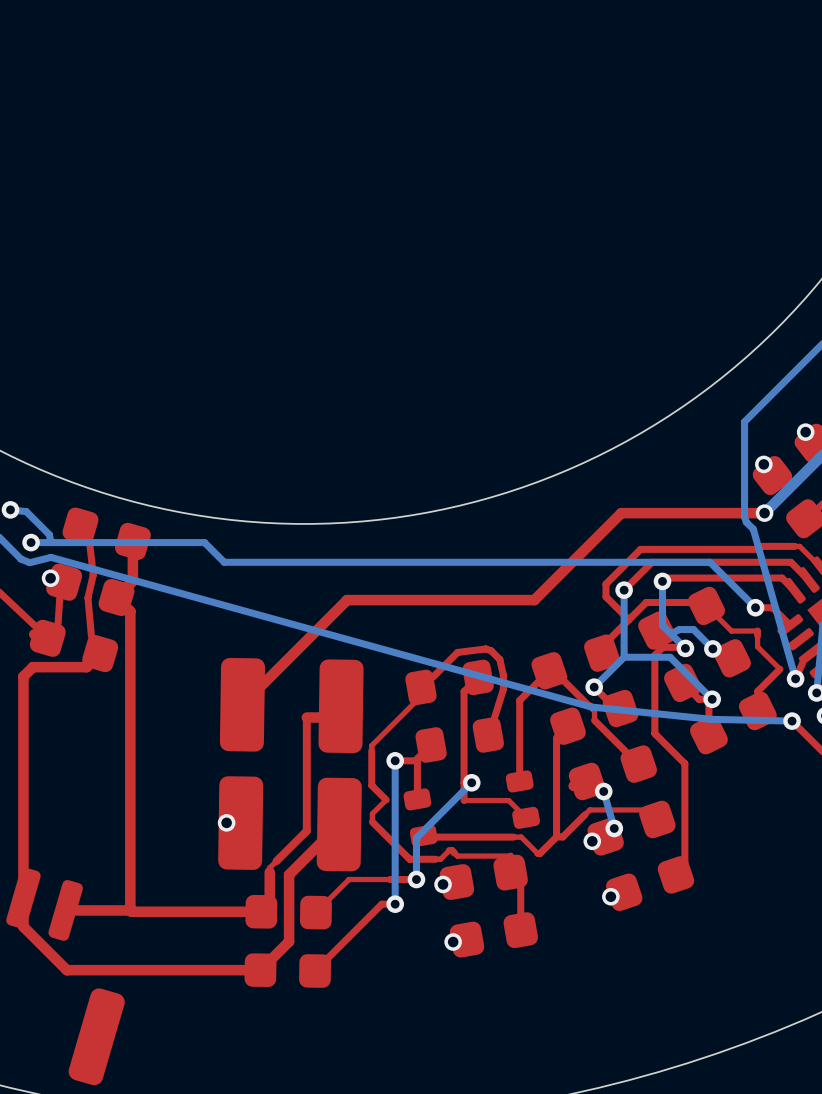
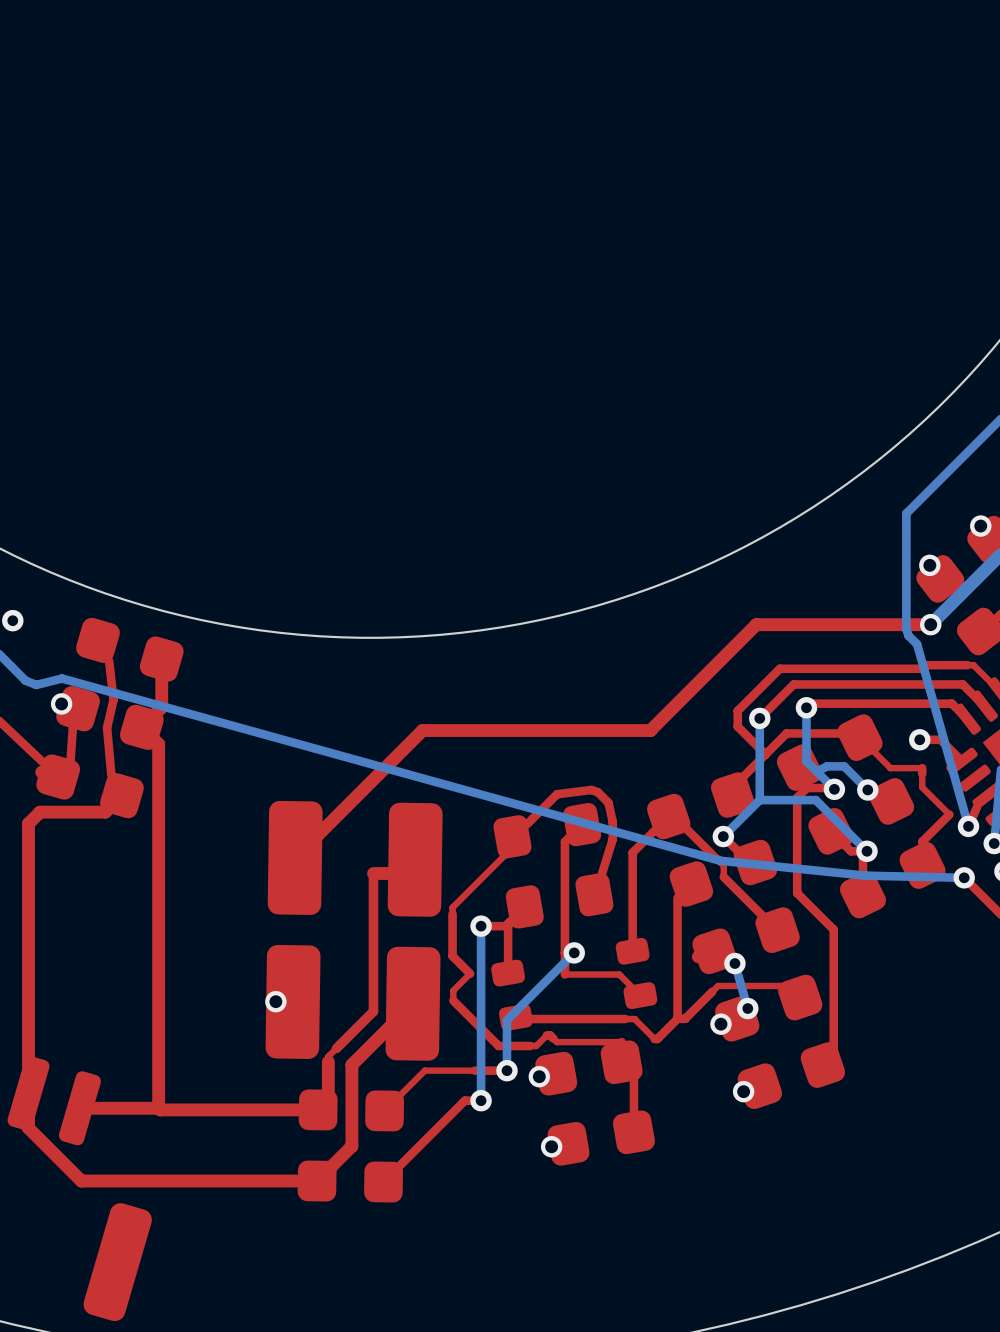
bottom track: (10, 509) (26, 511) (49, 534) (50, 541) -> none
bottom track: (31, 542) (204, 542) (224, 562) (710, 562) (755, 607) -> none
via: (31, 542) -> none

